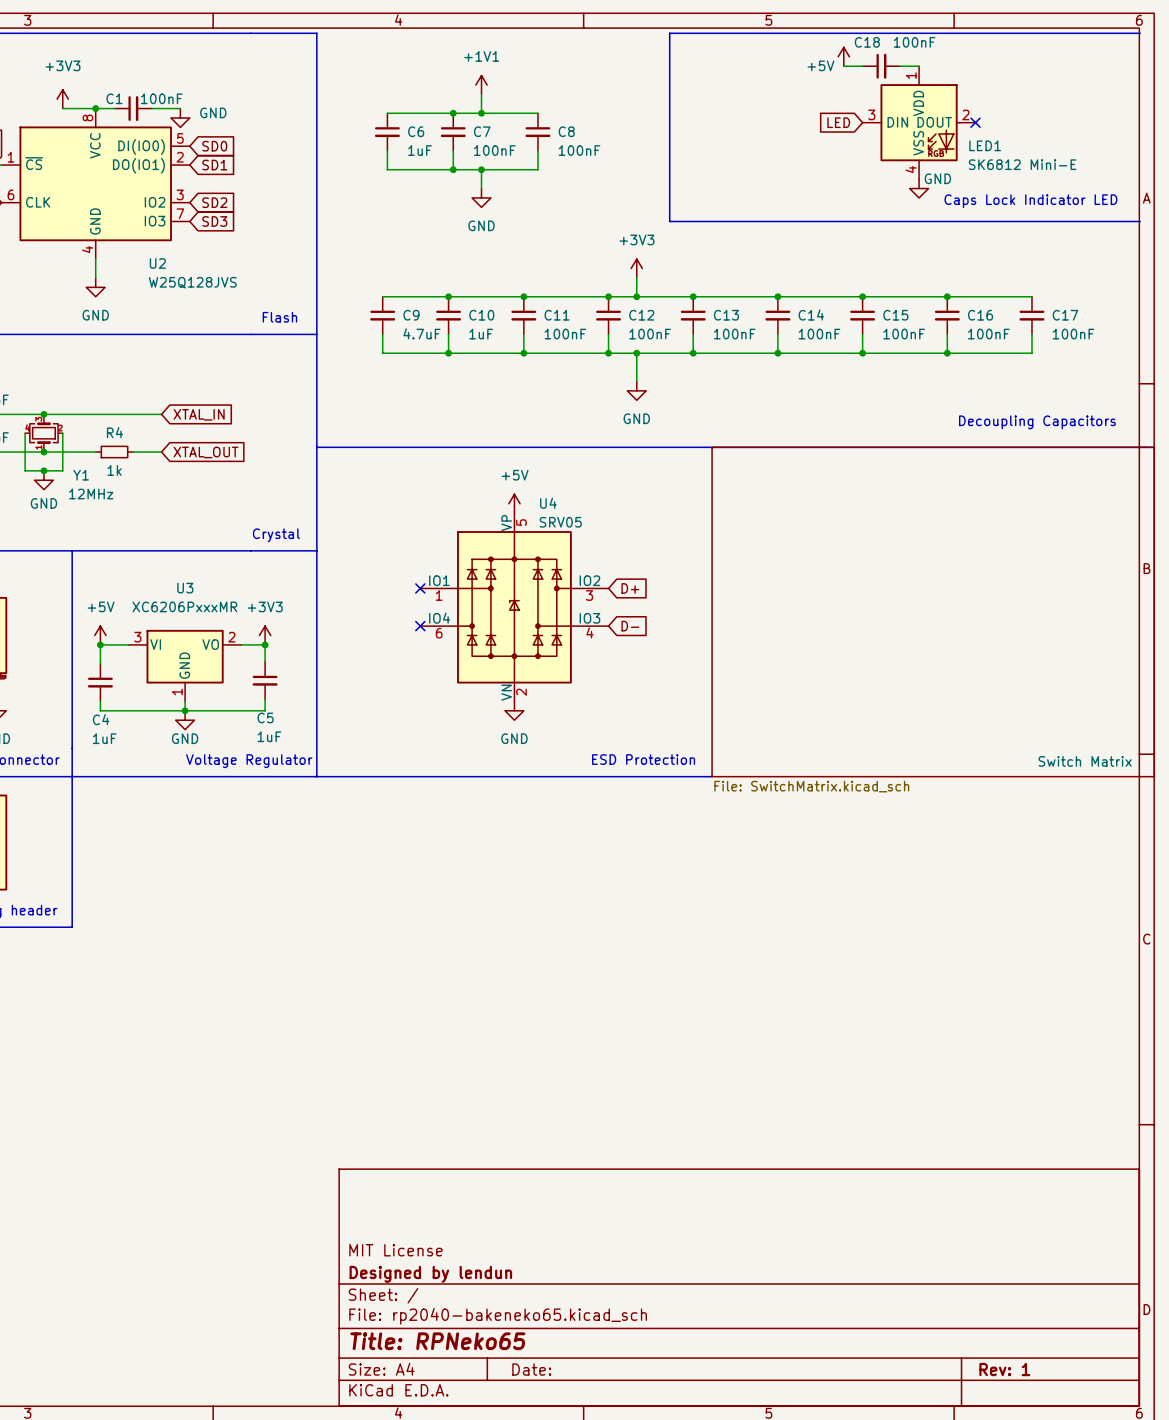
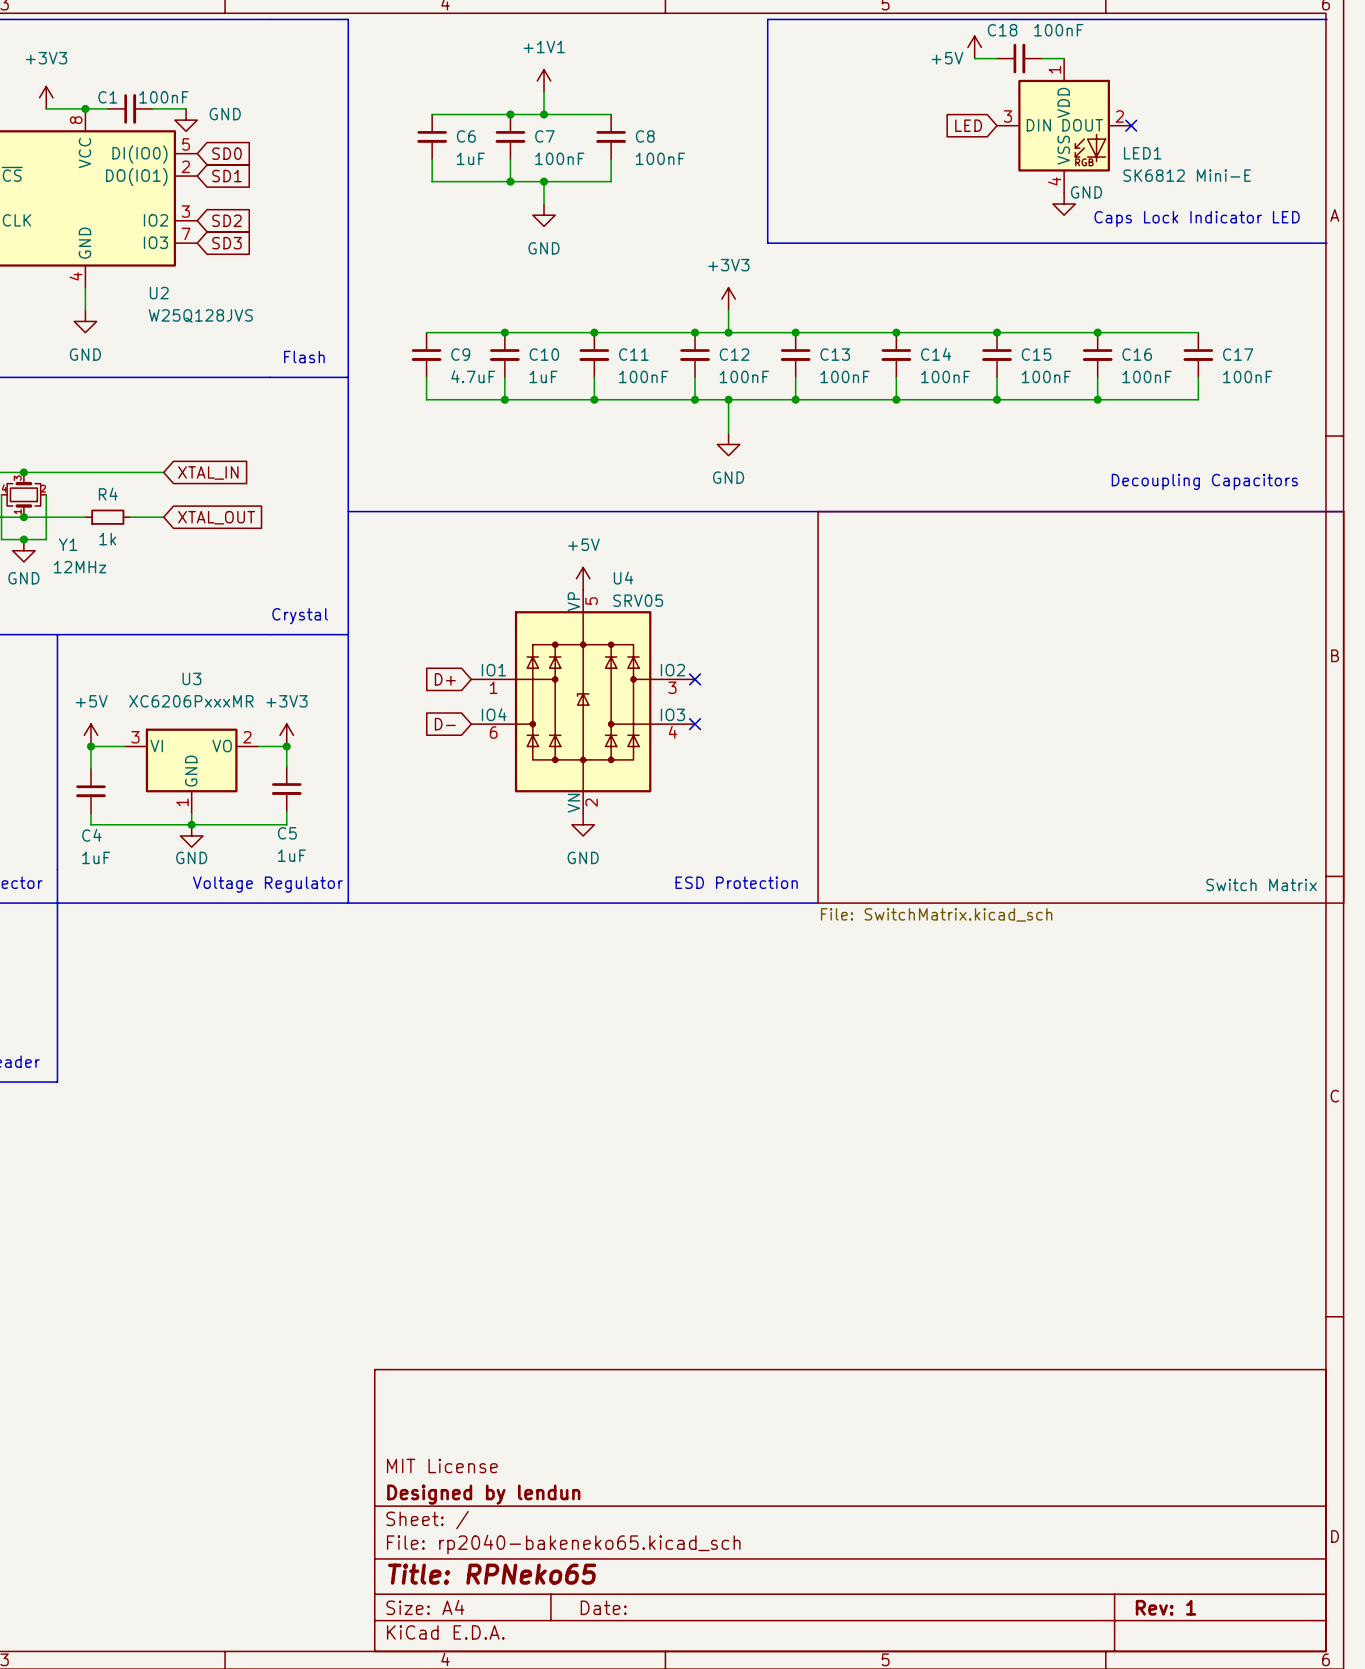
global label: none -> D+ (445, 679)
no-connect mark: (420, 588) -> none
no-connect mark: none -> (695, 679)
global label: D+ (630, 588) -> none
global label: none -> D- (445, 724)
no-connect mark: (420, 626) -> none
no-connect mark: none -> (695, 724)
global label: D- (630, 626) -> none

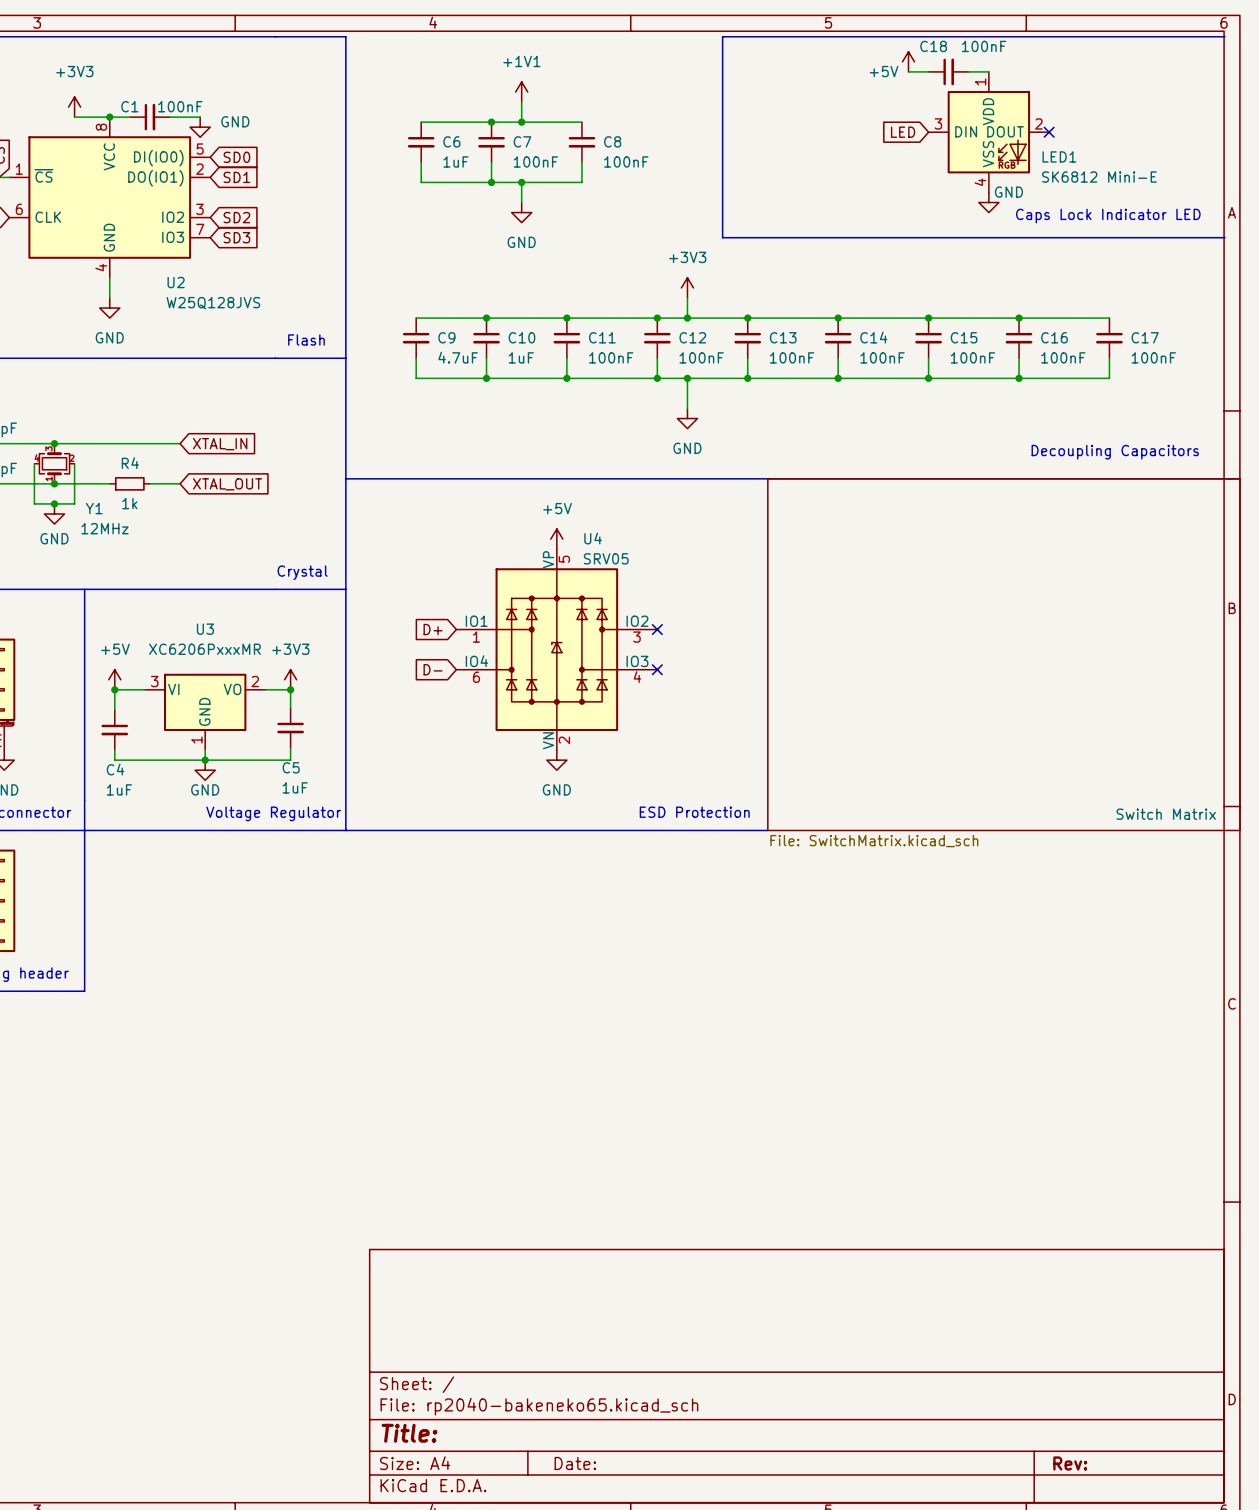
title block: MIT License (442, 1465) -> none
title block: Designed by lendun (483, 1494) -> none
title block: Title: RPNeko65 (492, 1574) -> Title: (409, 1433)
title block: Rev: 1 (1166, 1607) -> Rev: (1070, 1463)

